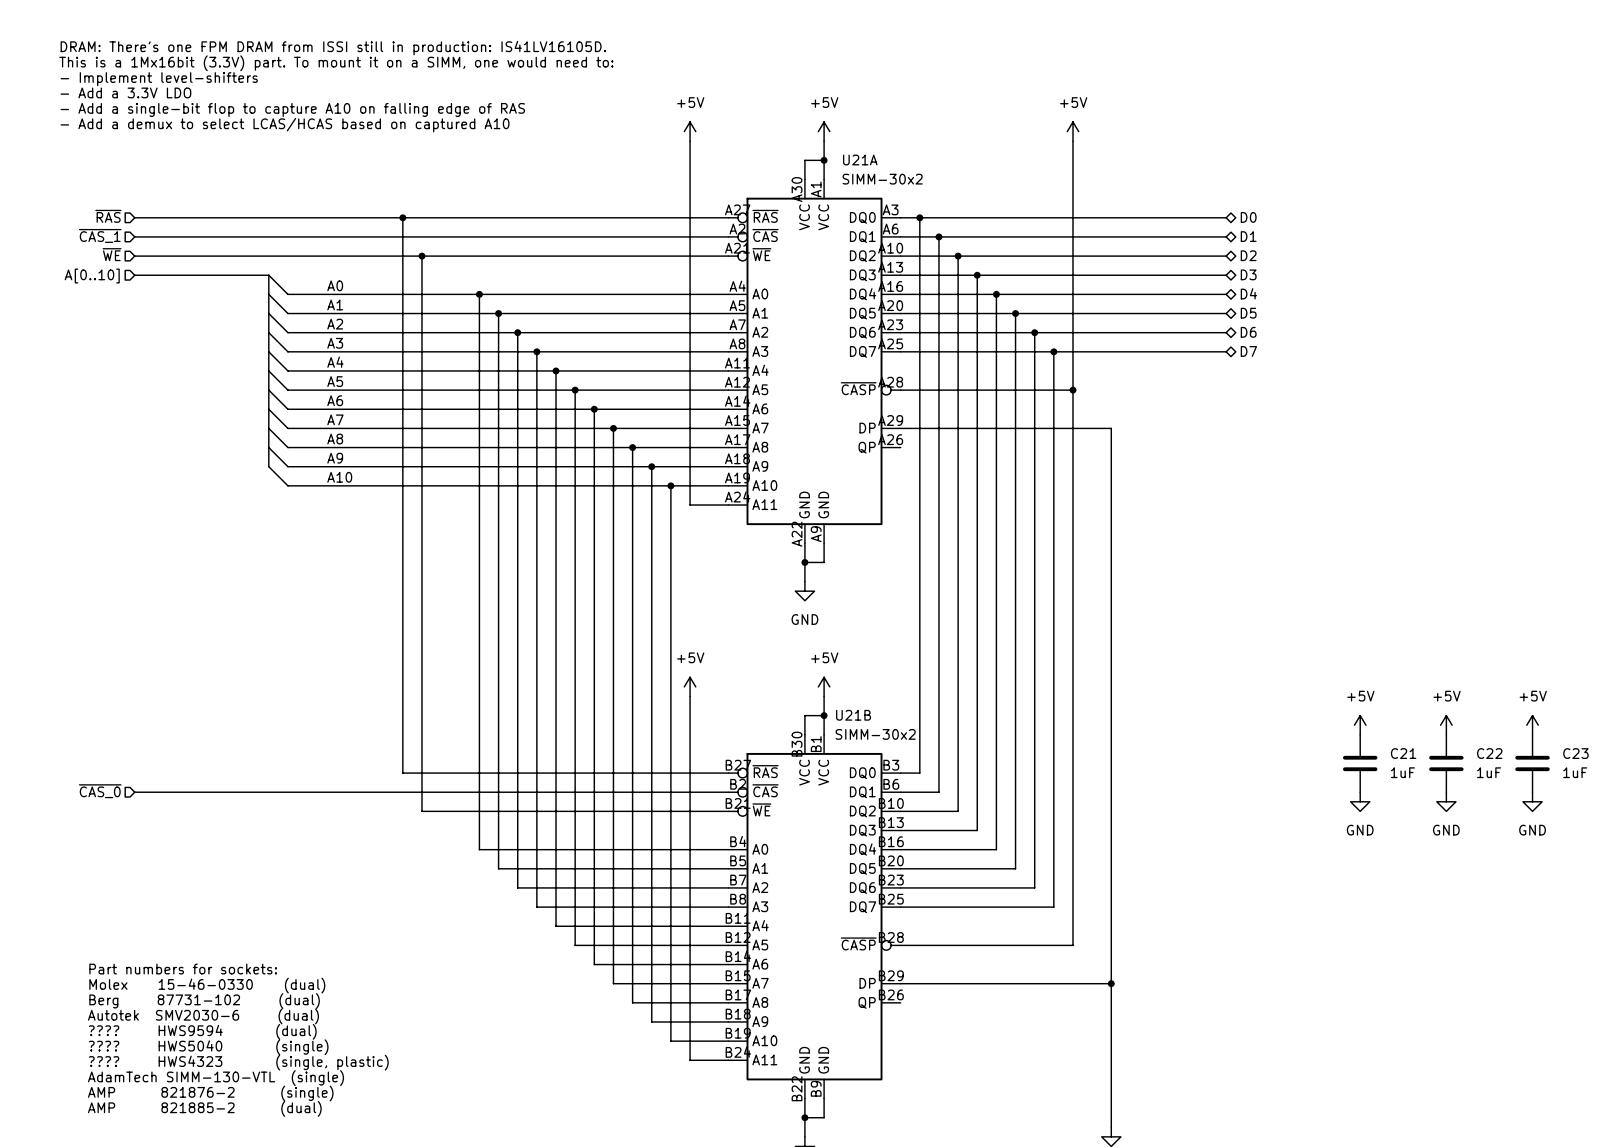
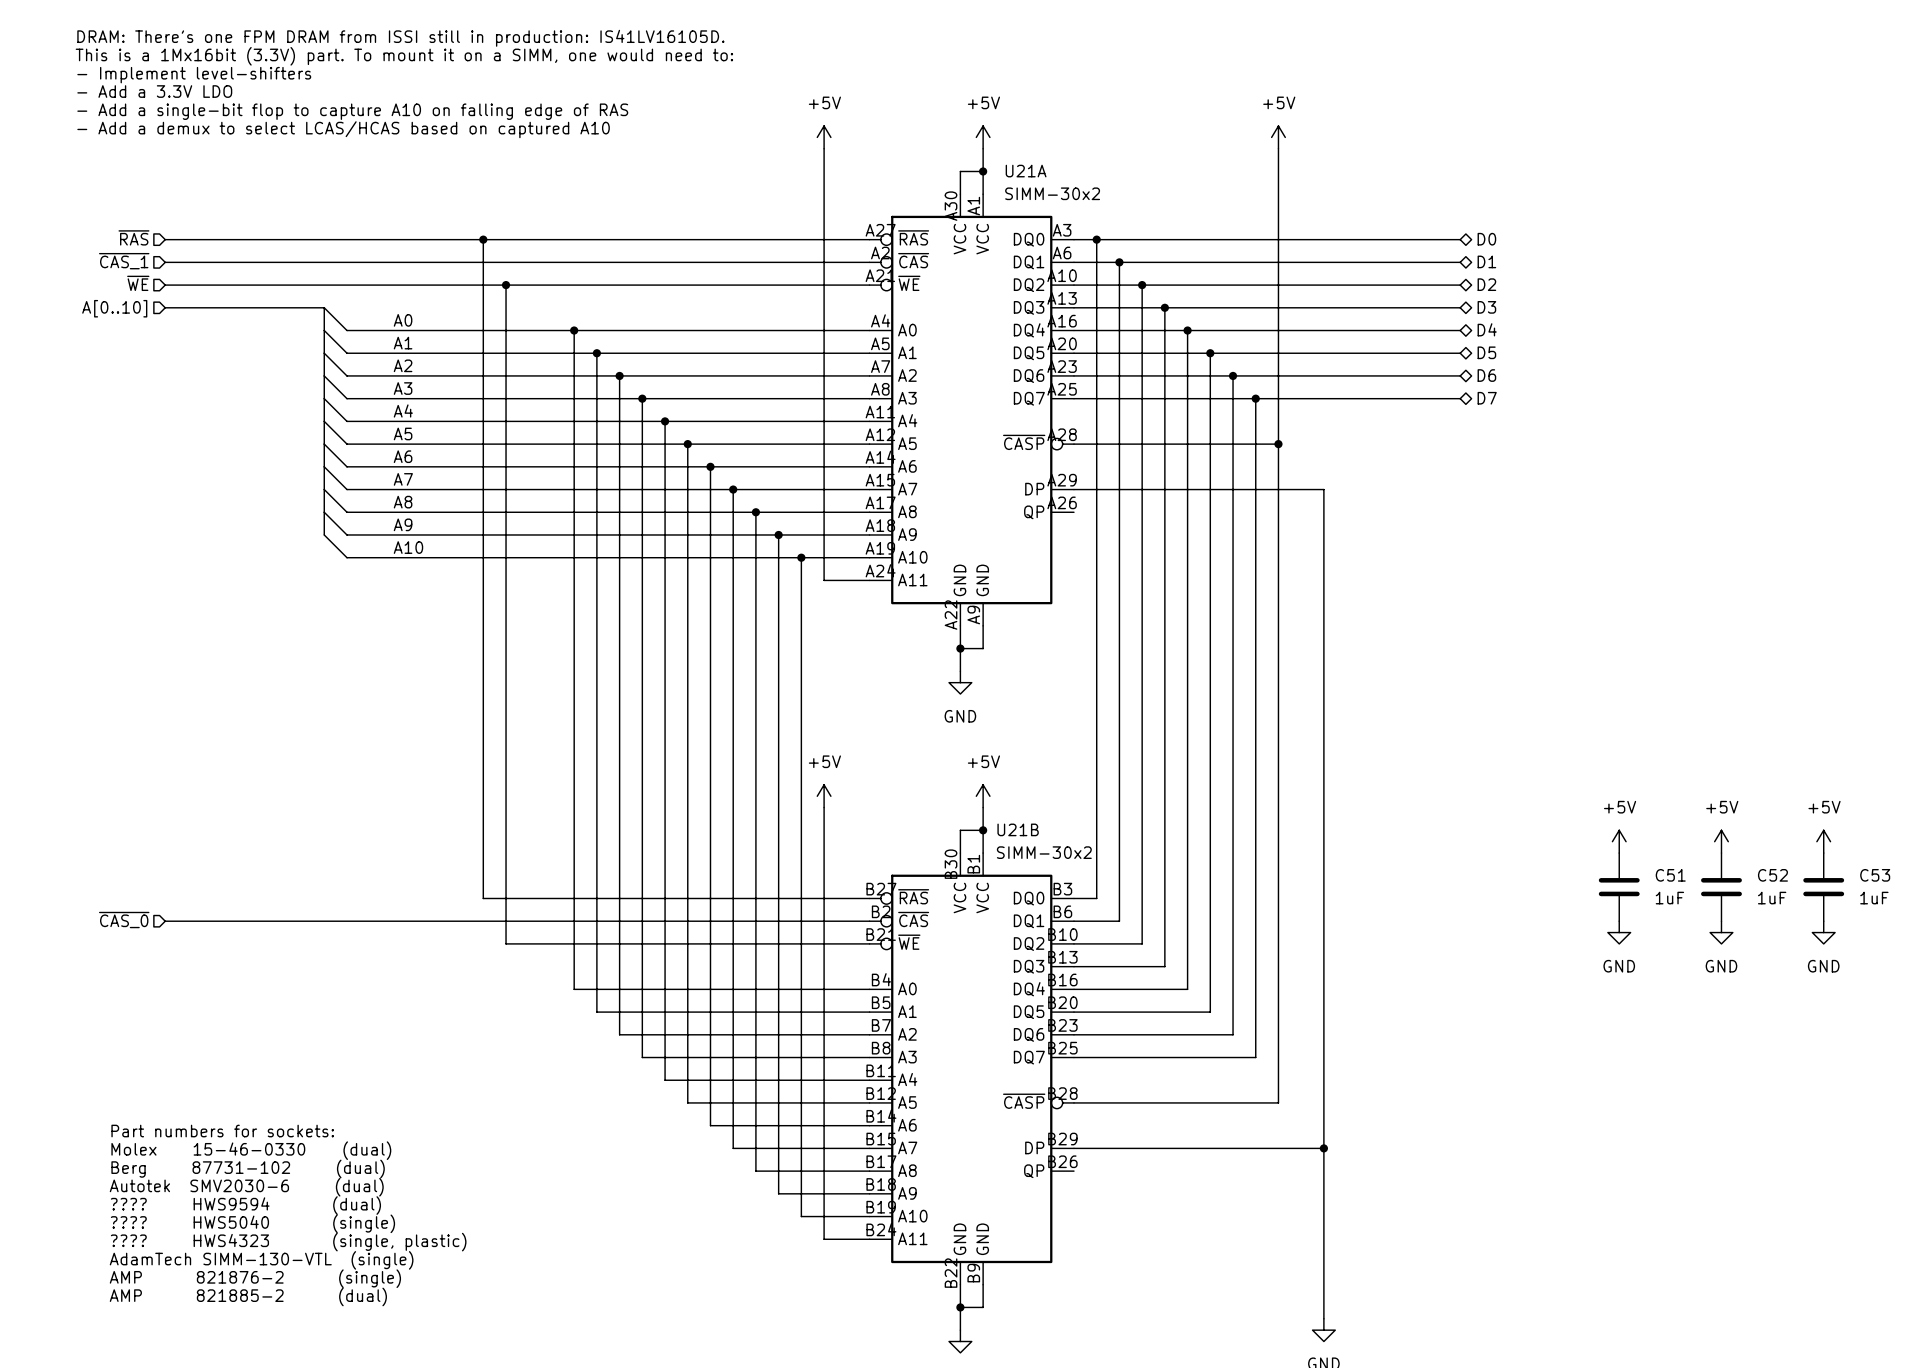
C21 name: C21 (1403, 753) -> C51 (1670, 875)
C22 name: C22 (1489, 753) -> C52 (1772, 875)
C23 name: C23 (1575, 753) -> C53 (1875, 875)

